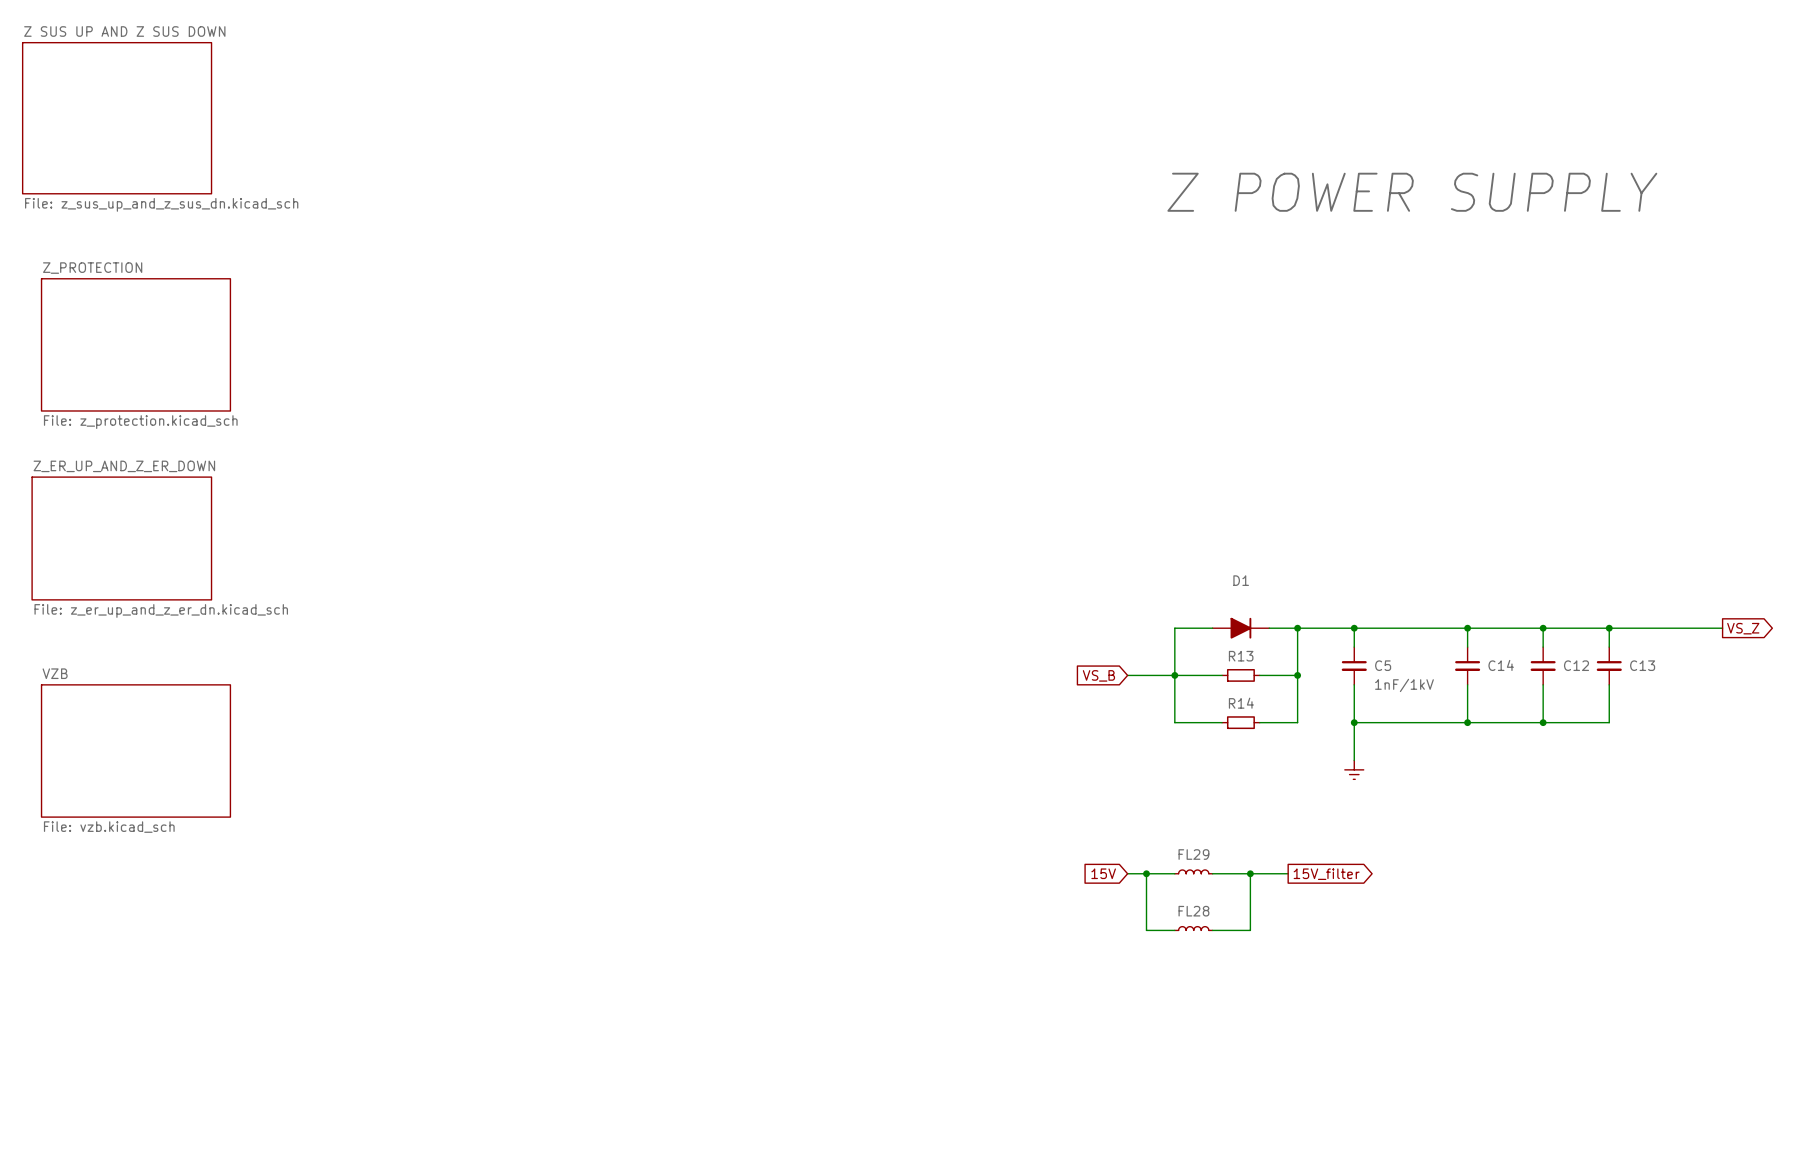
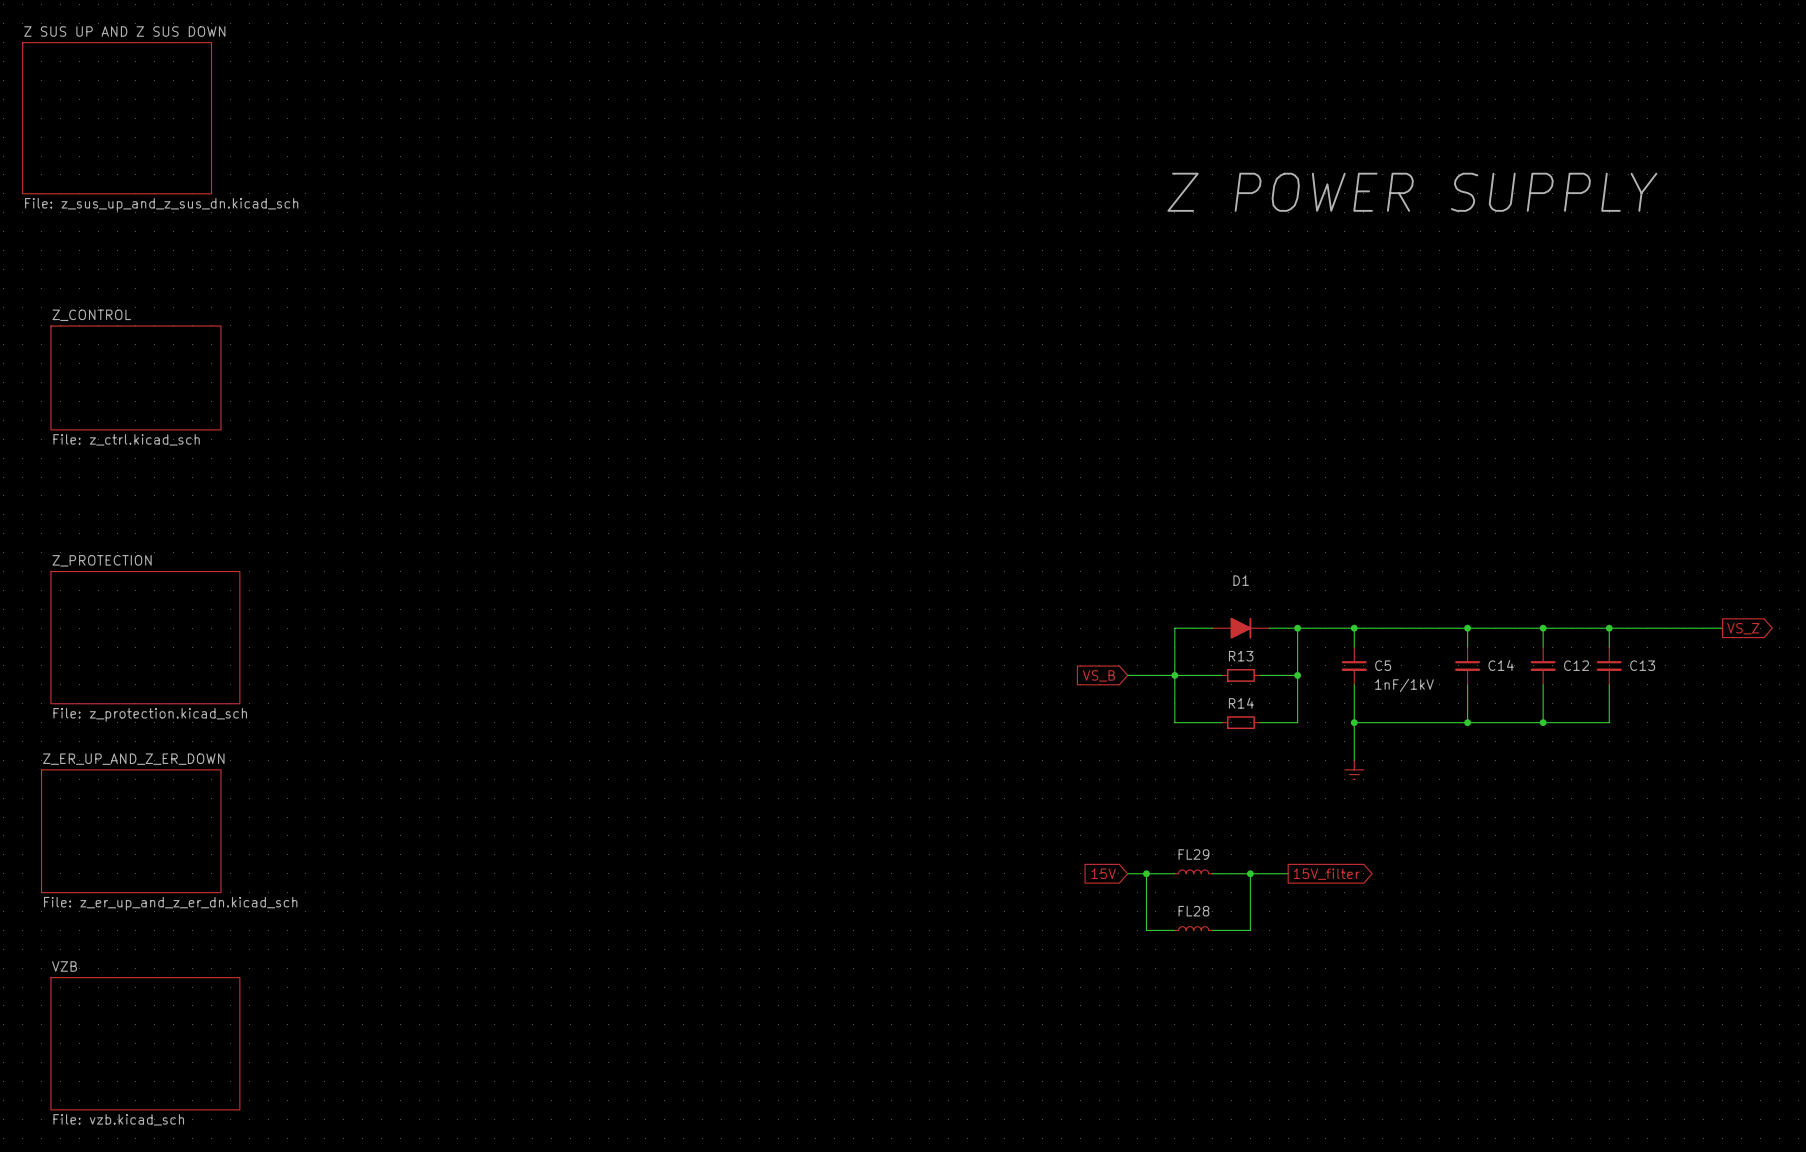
sheet Z_PROTECTION: File: z_protection.kicad_sch (135, 344) -> none
sheet Z_CONTROL: none -> File: z_ctrl.kicad_sch (135, 377)
sheet Z_ER_UP_AND_Z_ER_DOWN: File: z_er_up_and_z_er_dn.kicad_sch (121, 538) -> none
sheet Z_PROTECTION: none -> File: z_protection.kicad_sch (145, 637)
sheet VZB: File: vzb.kicad_sch (135, 750) -> none
sheet Z_ER_UP_AND_Z_ER_DOWN: none -> File: z_er_up_and_z_er_dn.kicad_sch (131, 831)
sheet VZB: none -> File: vzb.kicad_sch (145, 1043)

